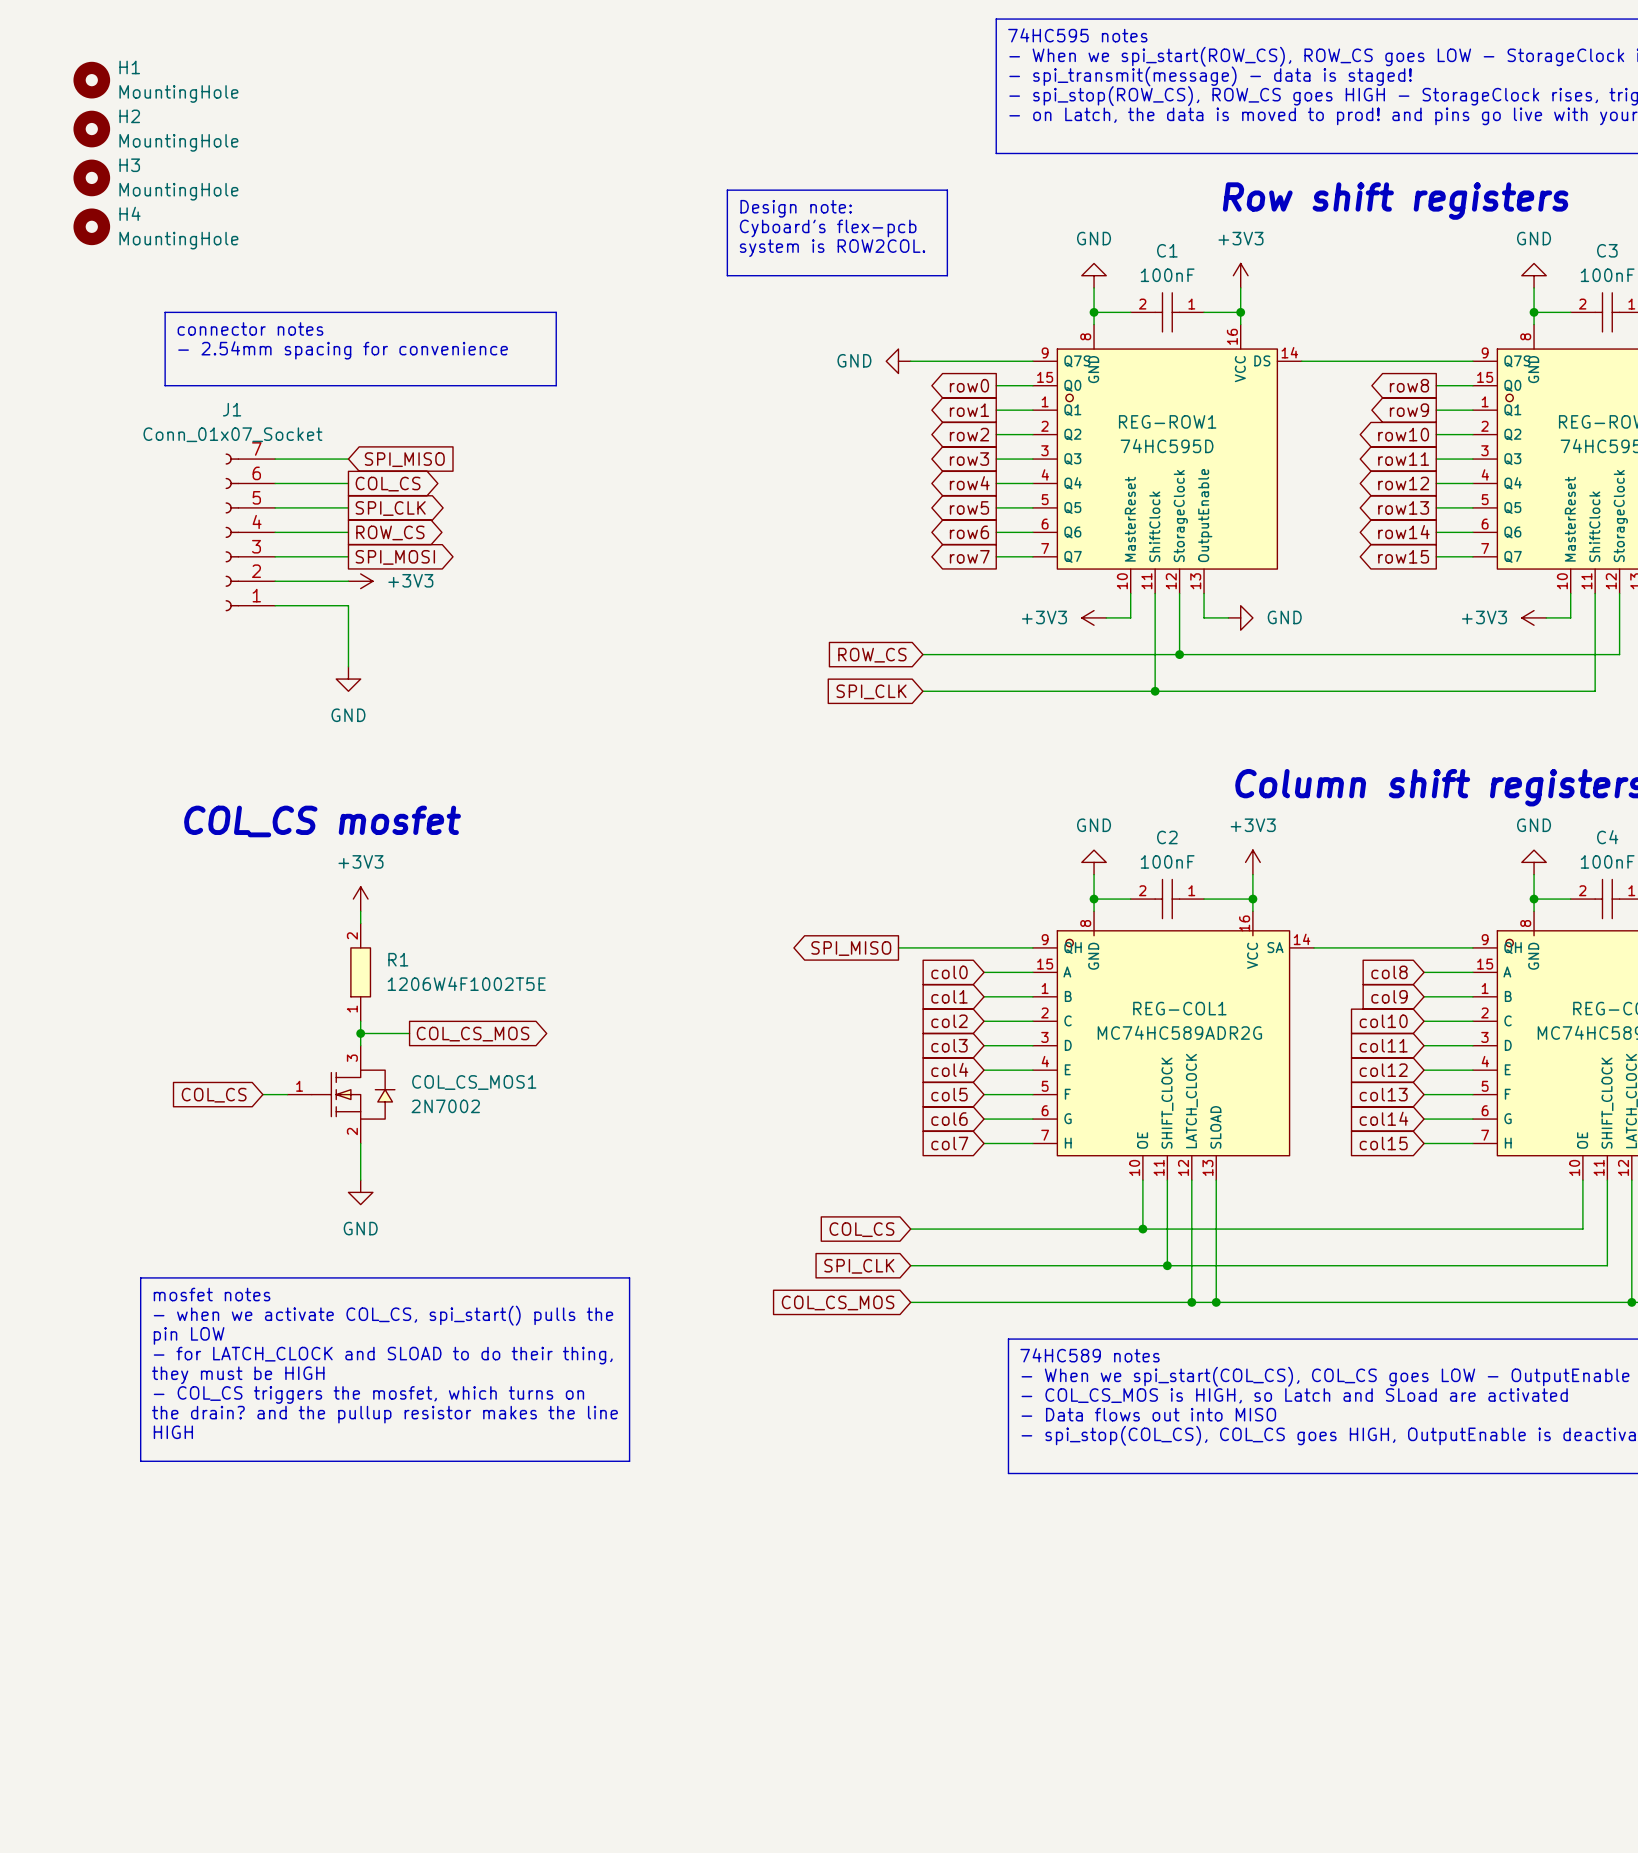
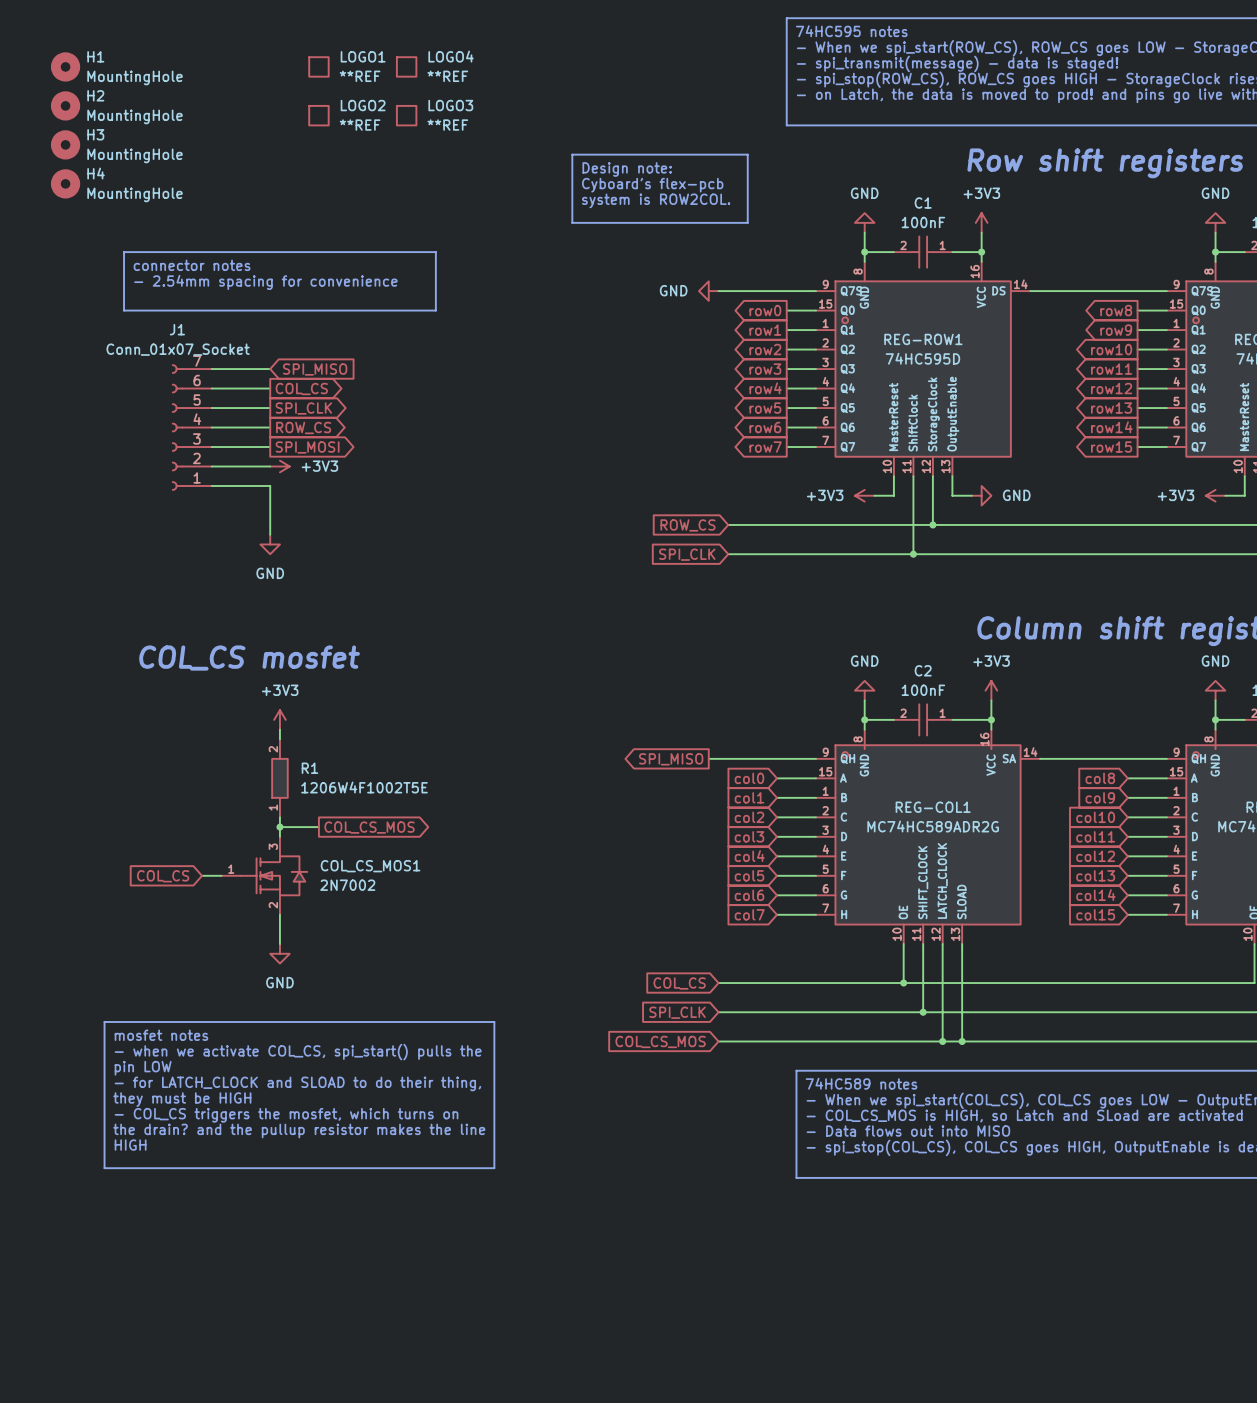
LOGO1: none -> **REF (318, 66)
LOGO4: none -> **REF (406, 66)
LOGO2: none -> **REF (318, 115)
LOGO3: none -> **REF (406, 115)

